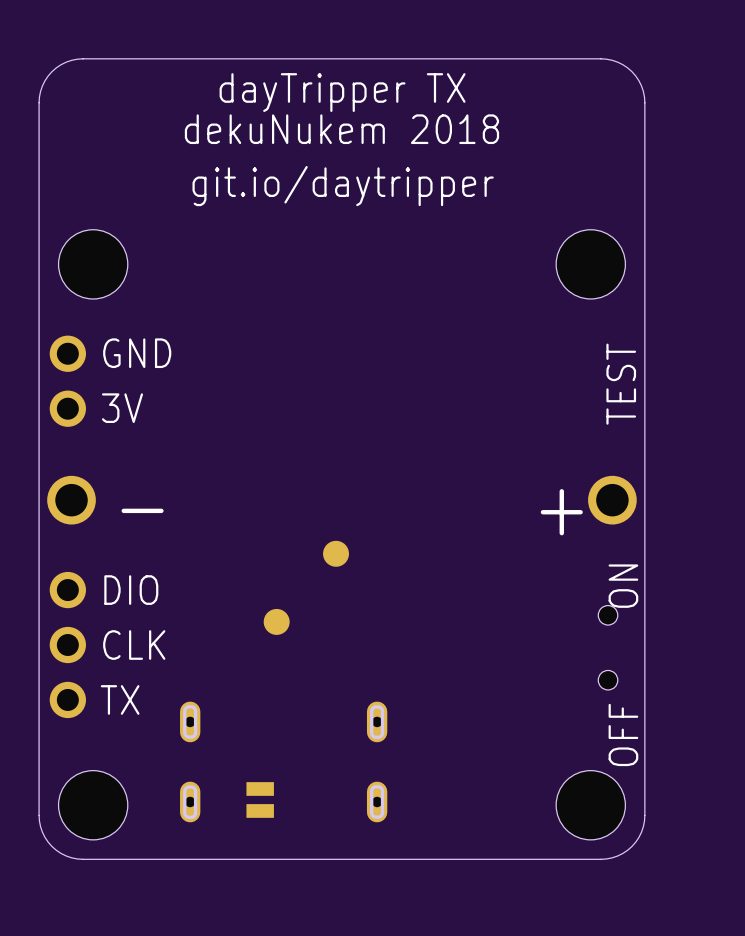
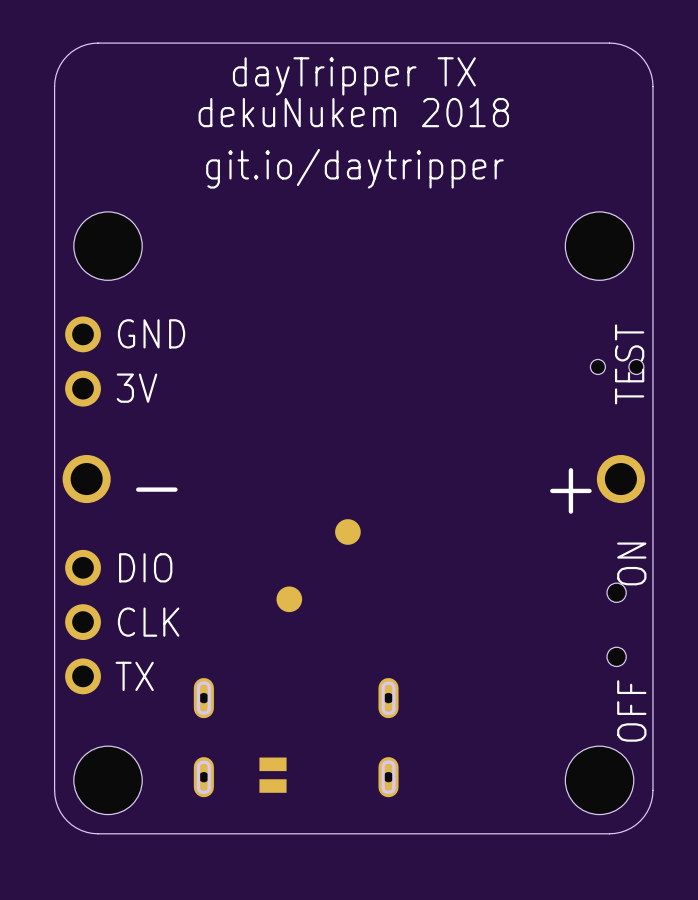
part: none -> (617, 366)

